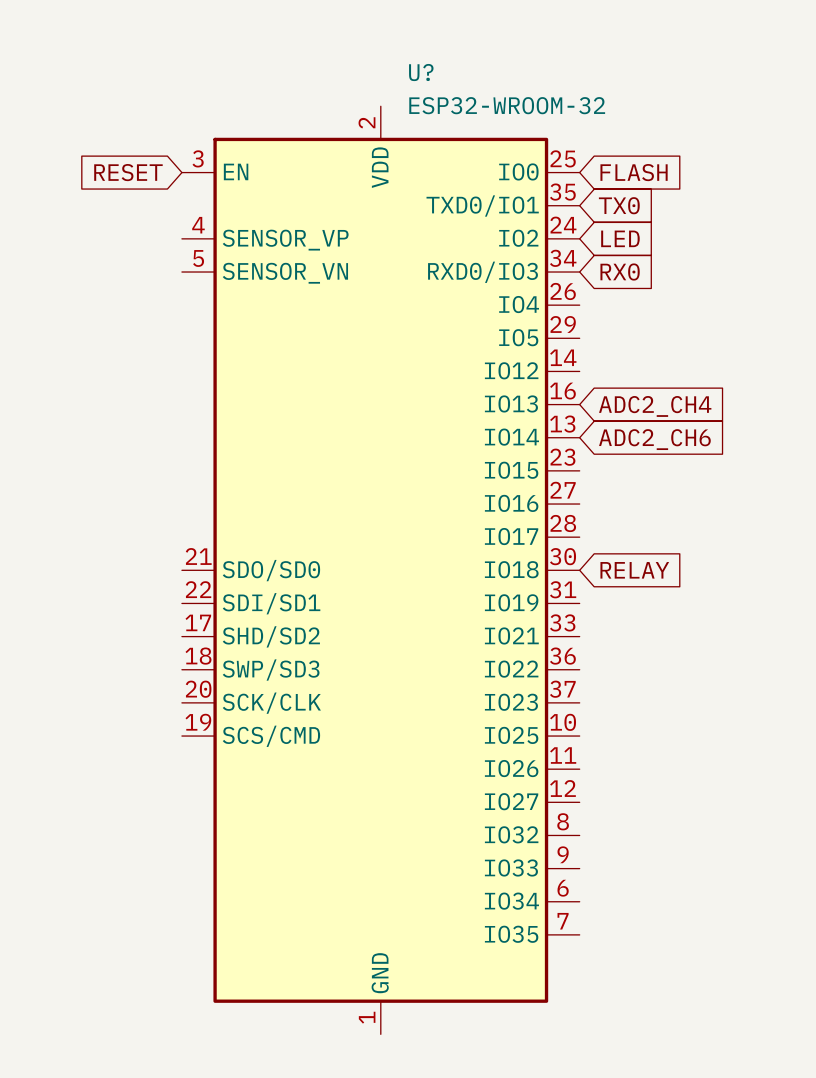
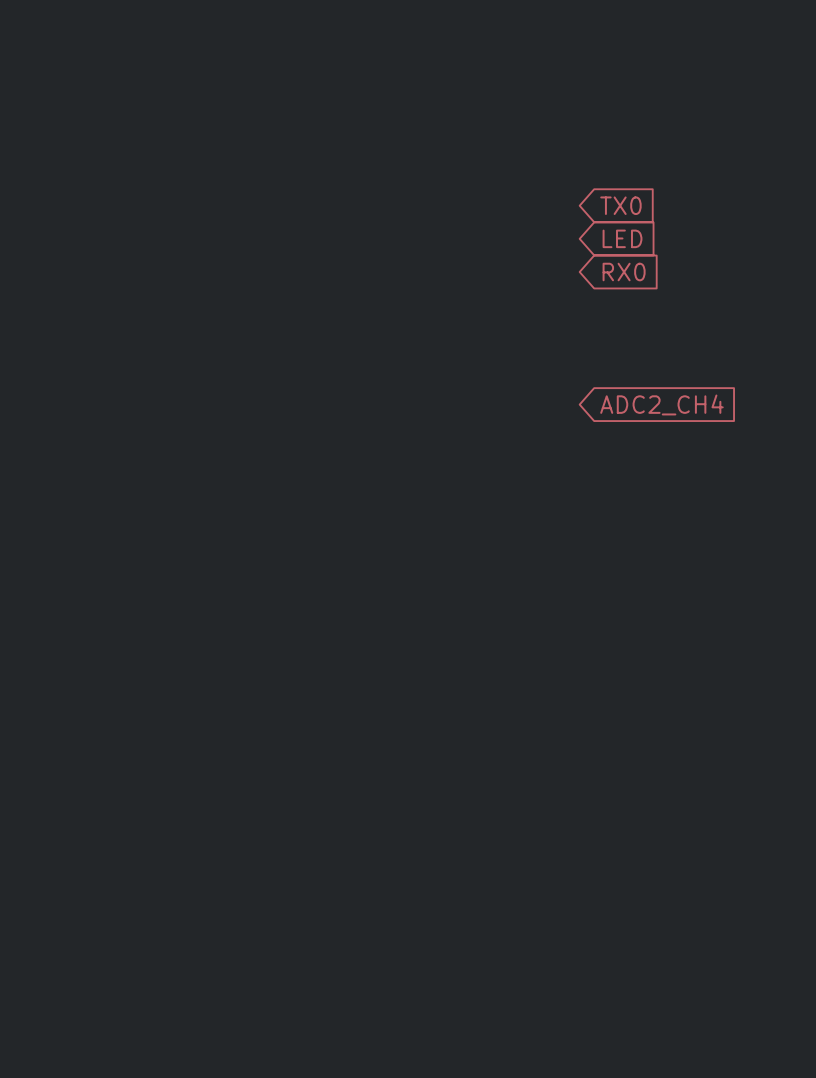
global label: RESET (128, 172) -> none
global label: FLASH (634, 172) -> none
global label: ADC2_CH6 (654, 439) -> none
U?: ESP32-WROOM-32 (380, 570) -> none
global label: RELAY (634, 570) -> none

